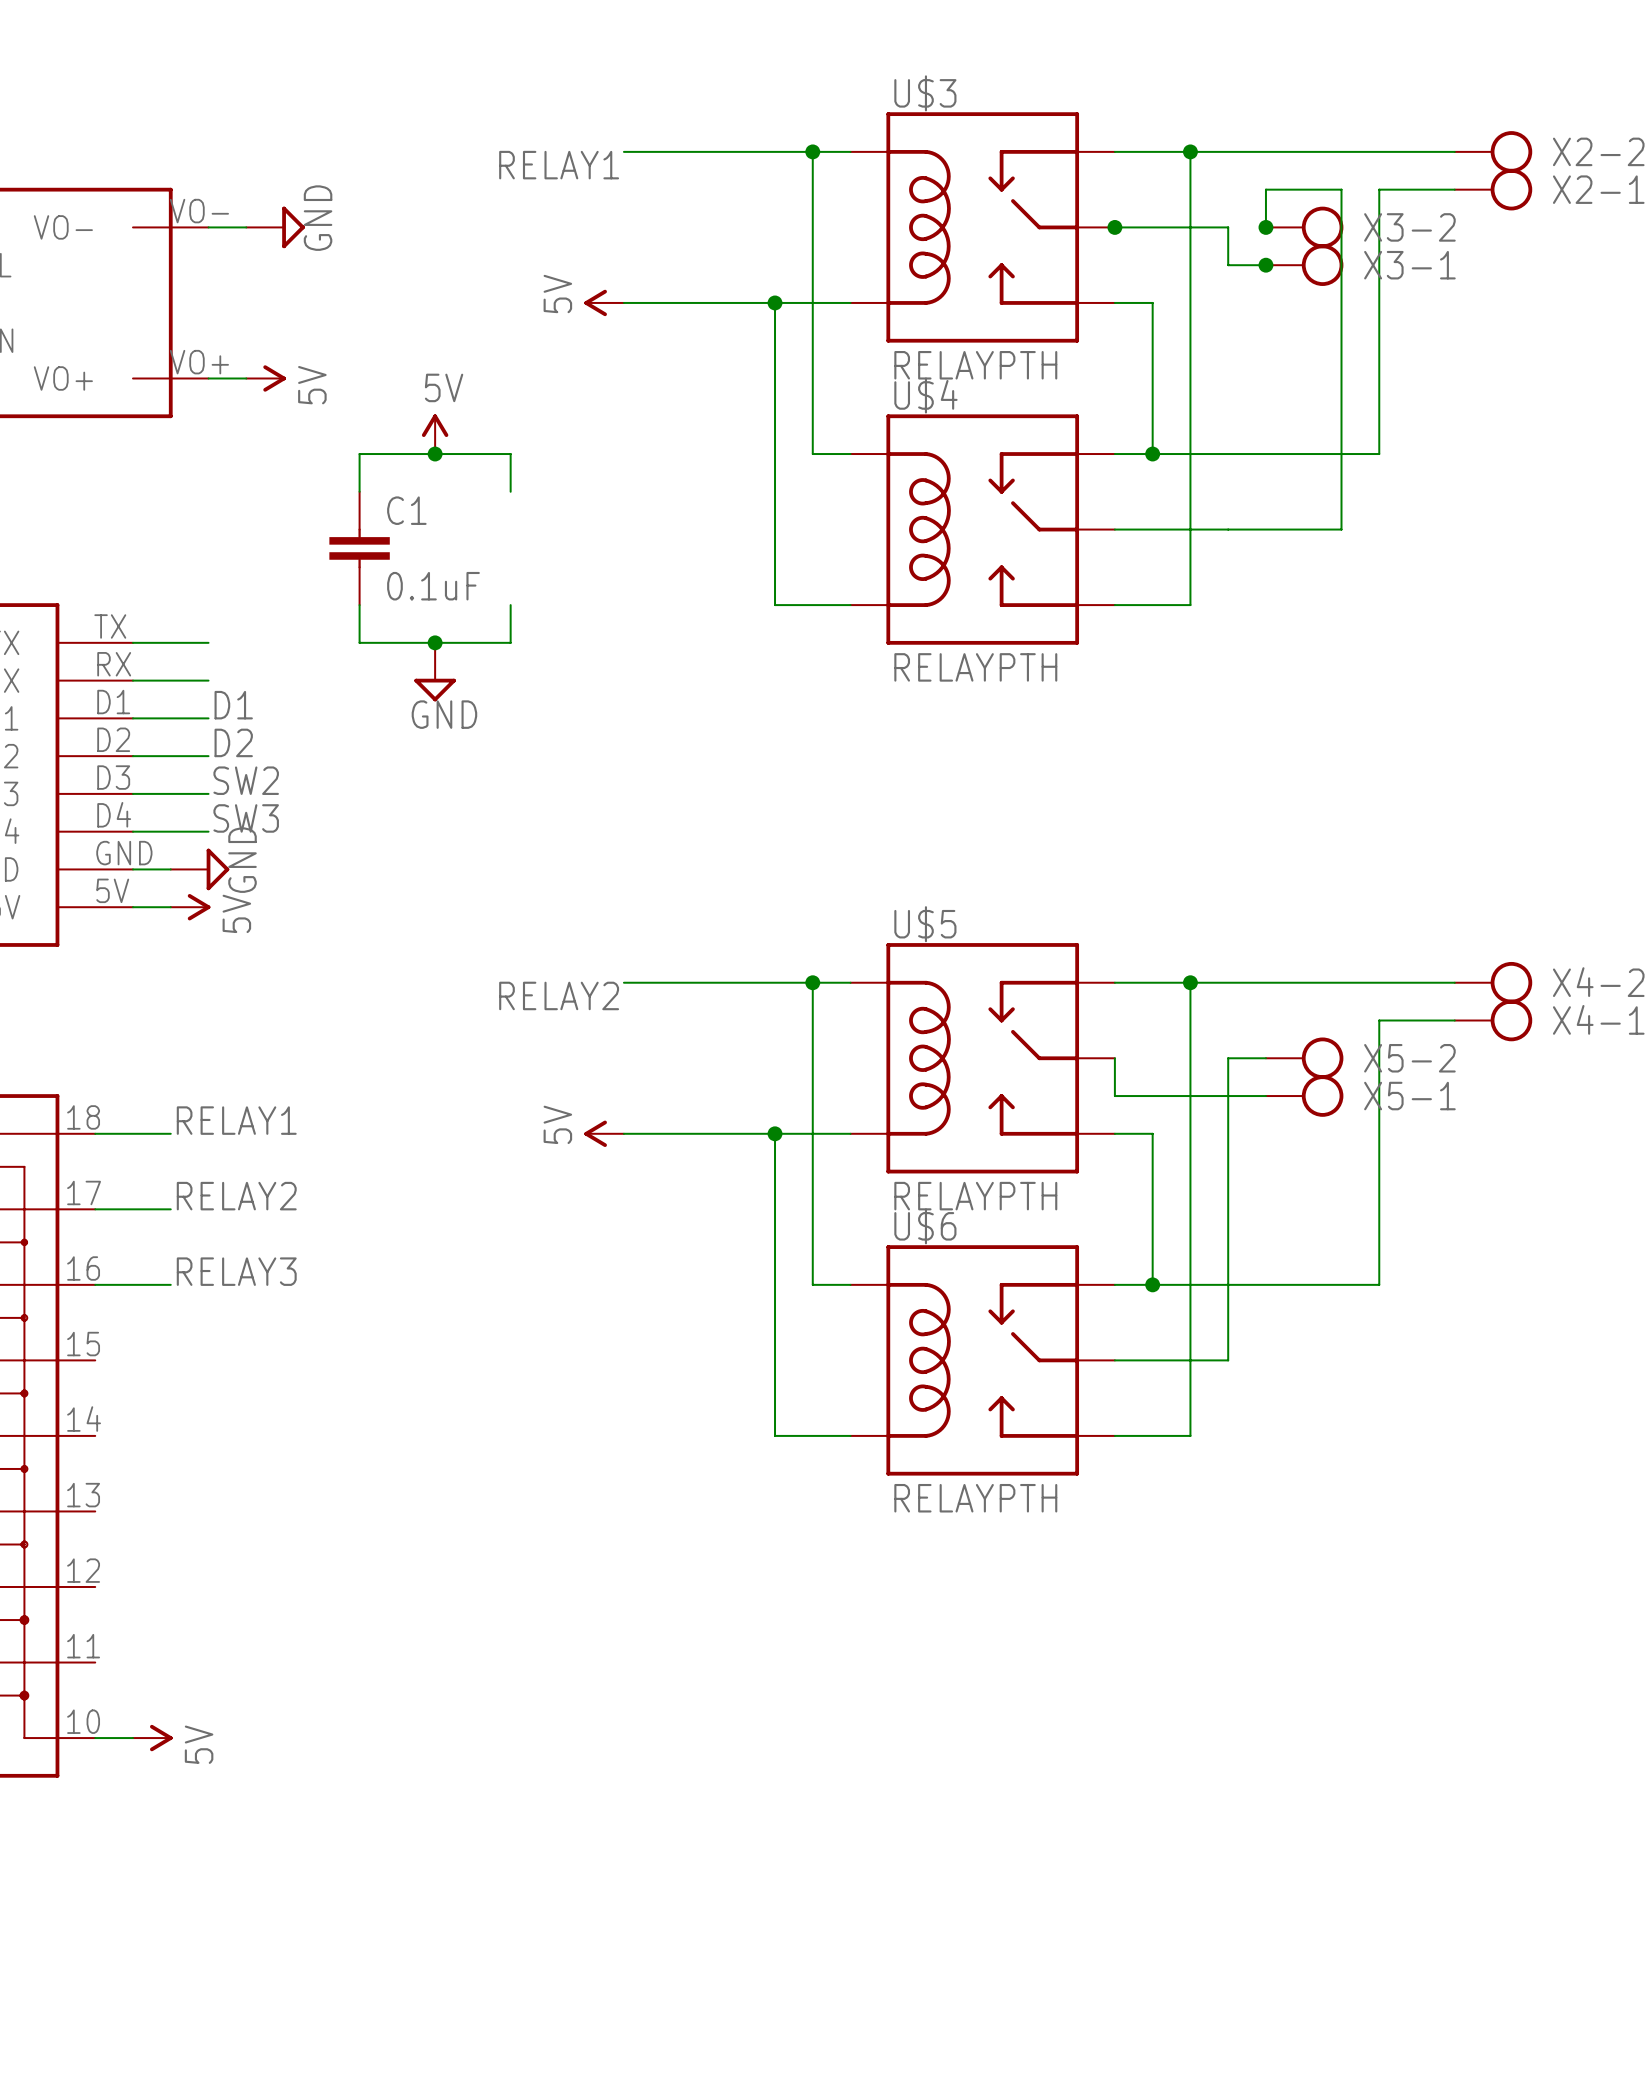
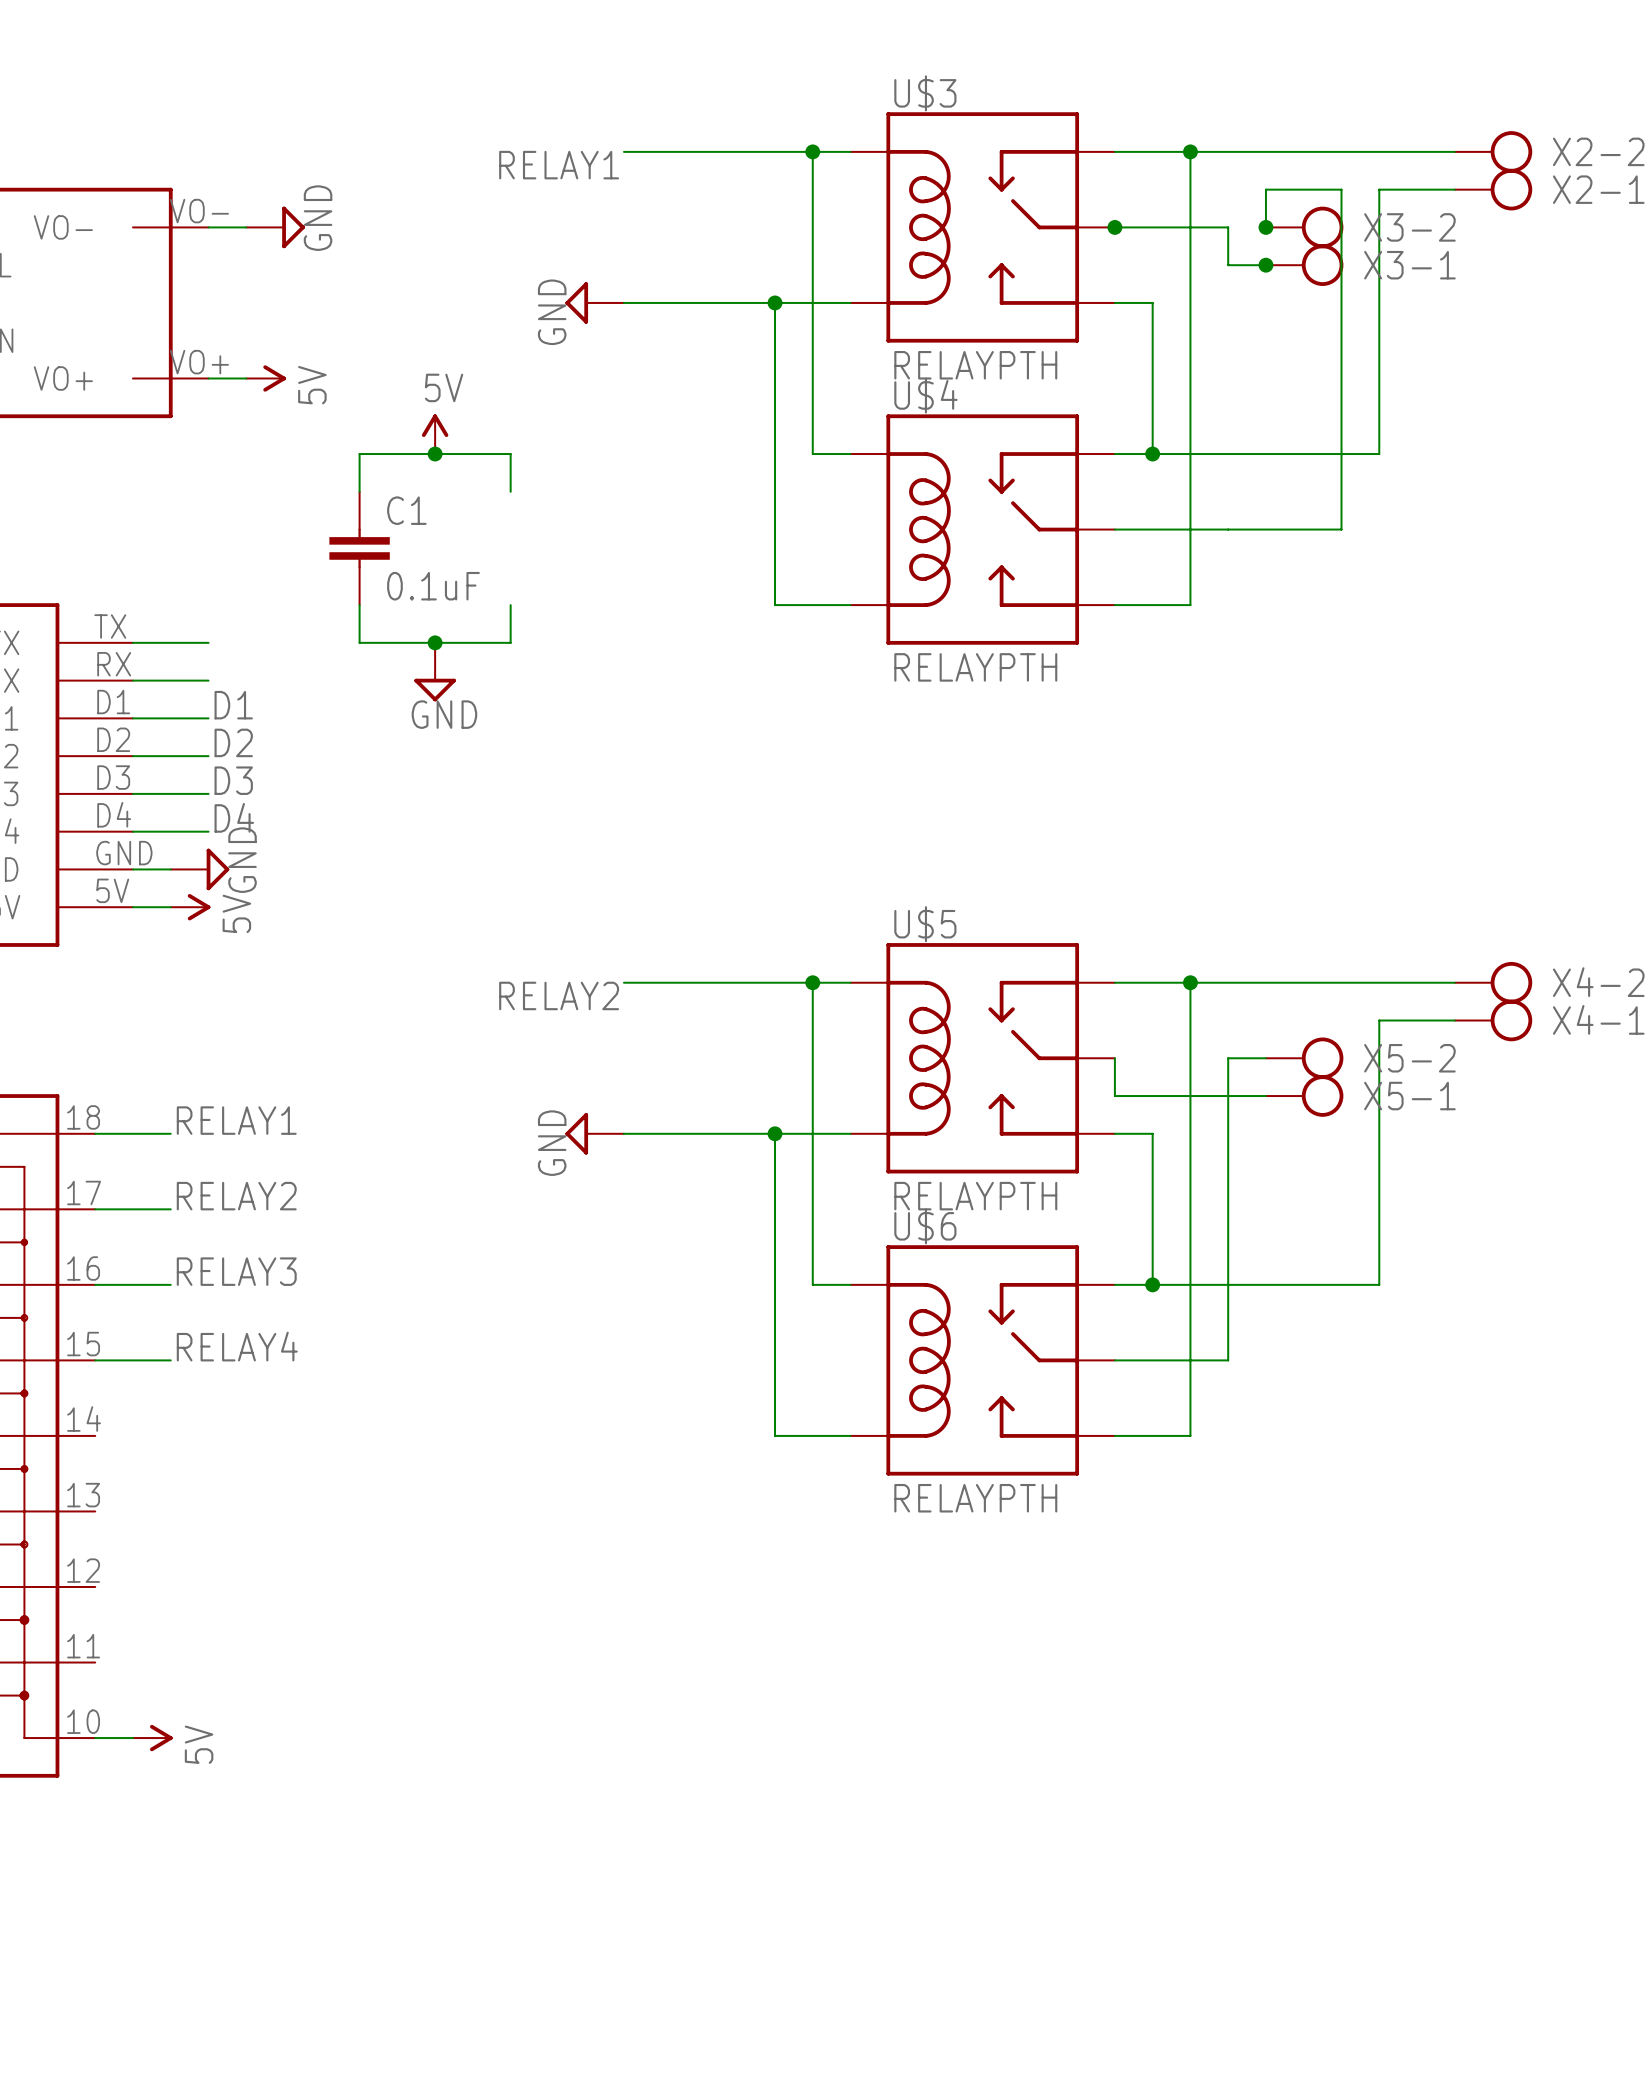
power symbol: 5V (604, 302) -> GND (594, 302)
label: SW2 (246, 780) -> D3 (233, 780)
label: SW3 (246, 818) -> D4 (234, 817)
power symbol: 5V (604, 1133) -> GND (594, 1133)
label: none -> RELAY4 (237, 1346)
wire: none -> (95, 1360) (170, 1360)

